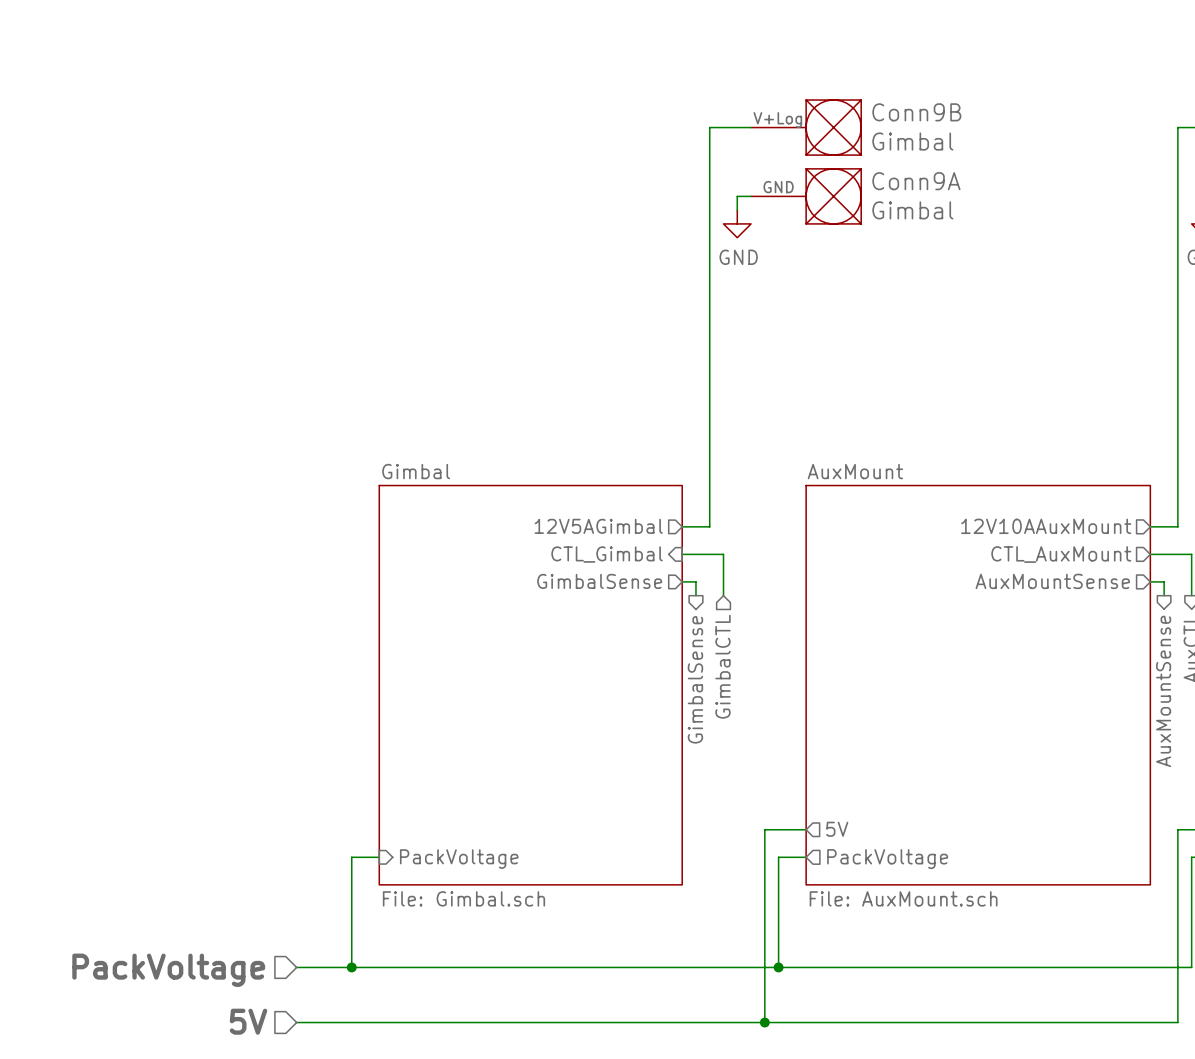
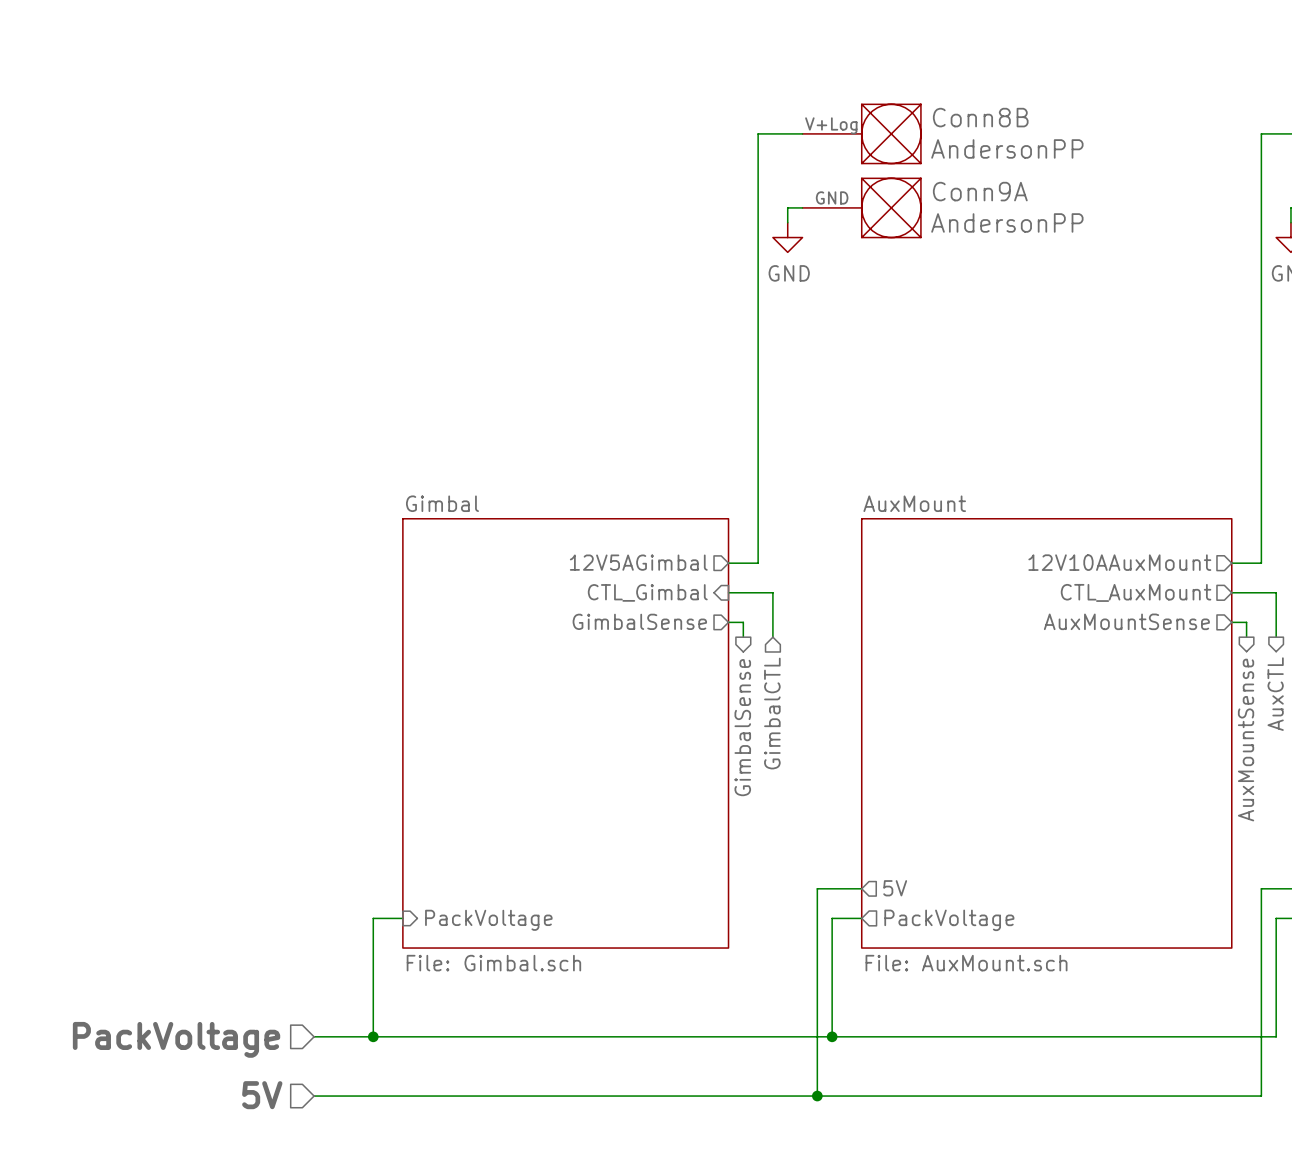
Conn9B name: Conn9B (916, 112) -> Conn8B (980, 117)
Conn9B value: Gimbal (912, 141) -> AndersonPP (1007, 148)
Conn9A value: Gimbal (912, 210) -> AndersonPP (1007, 222)

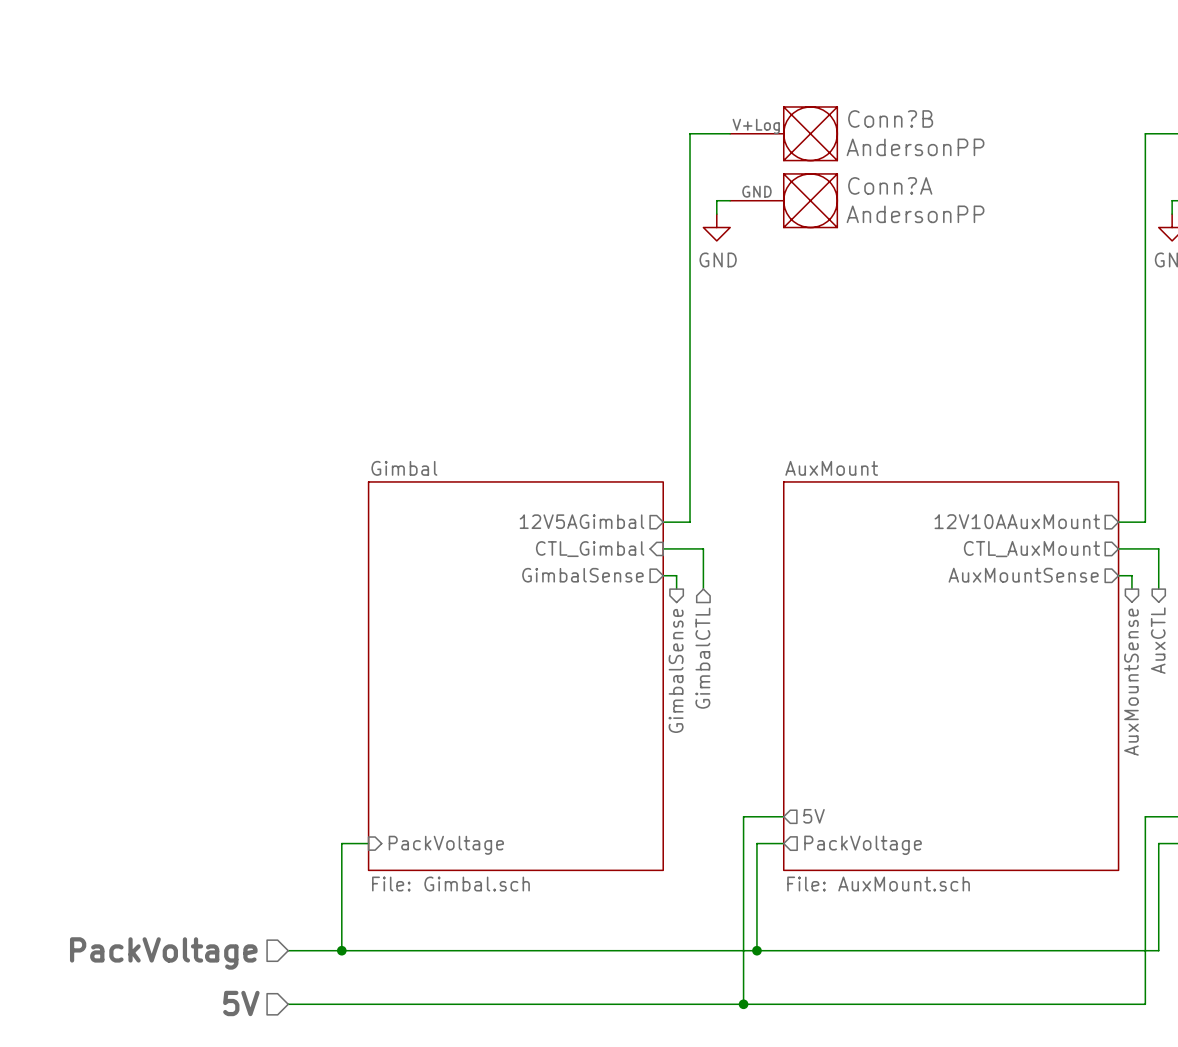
Conn8B name: Conn8B (980, 117) -> Conn?B (890, 118)
Conn9A name: Conn9A (980, 191) -> Conn?A (890, 185)

